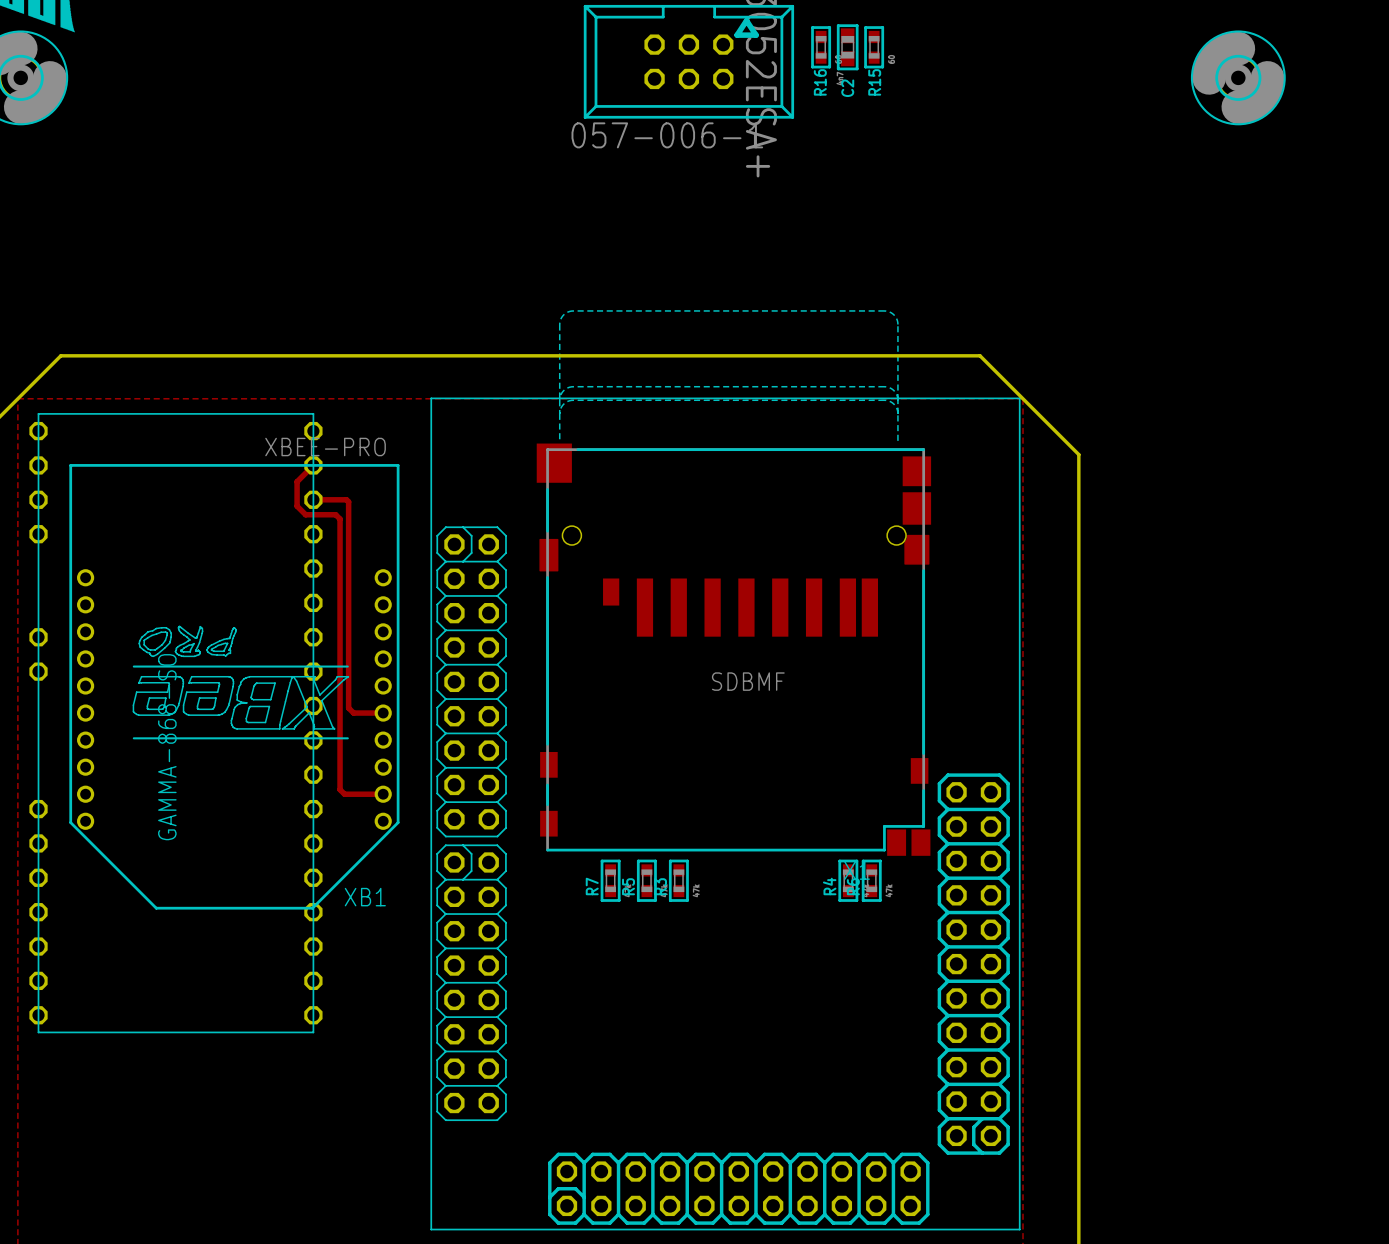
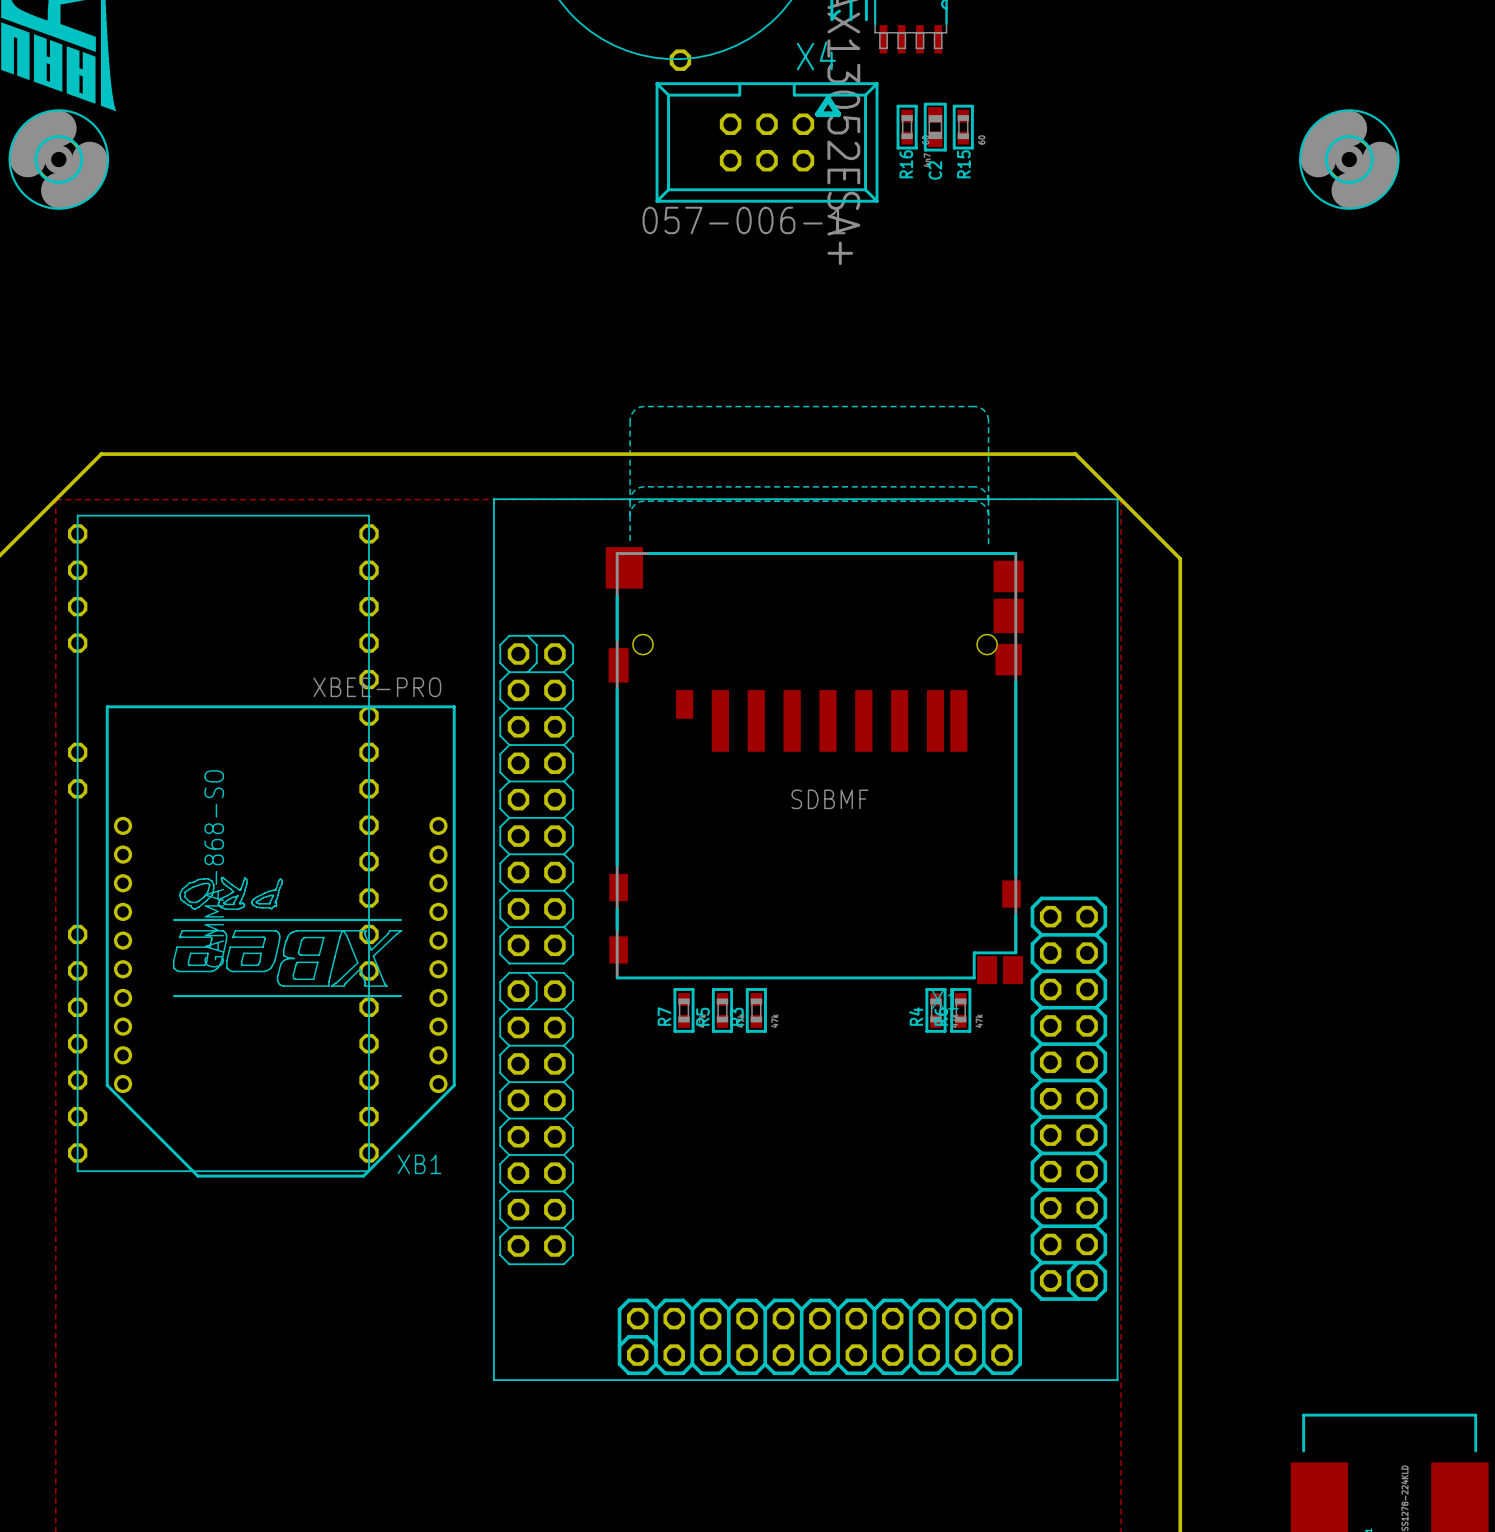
track: (313, 465) (297, 481) (297, 506) (305, 514) (335, 514) (340, 519) (340, 789) (344, 794) (383, 794) -> none
track: (313, 499) (346, 499) (348, 501) (348, 708) (353, 713) (383, 713) -> none
XB1 position: (234, 686) -> (280, 941)

